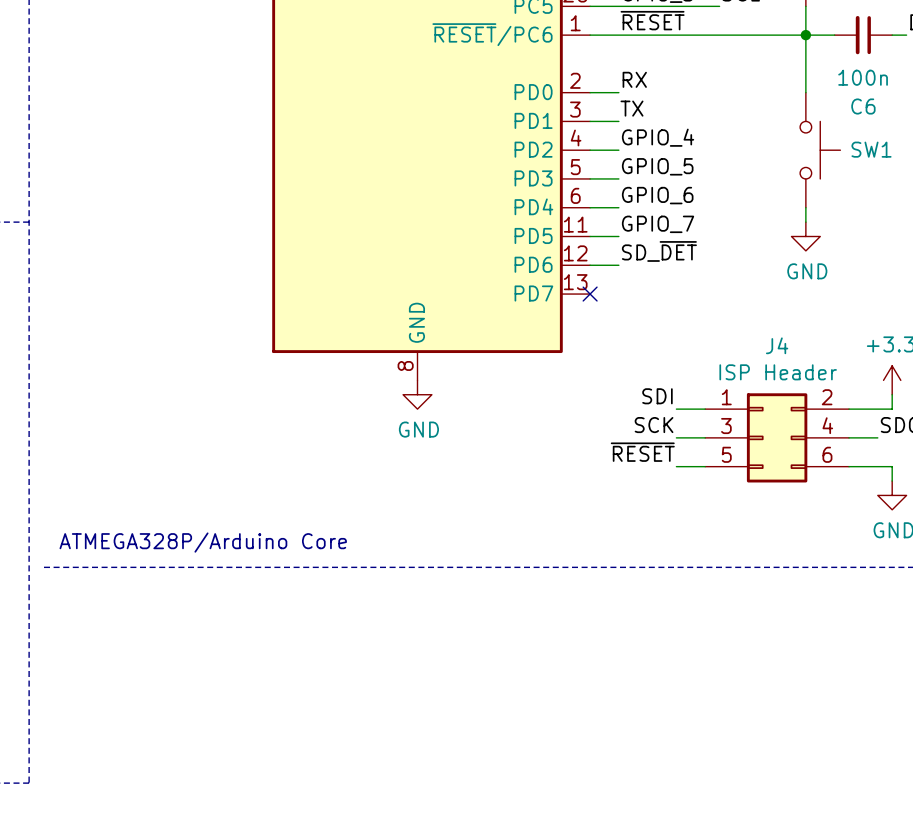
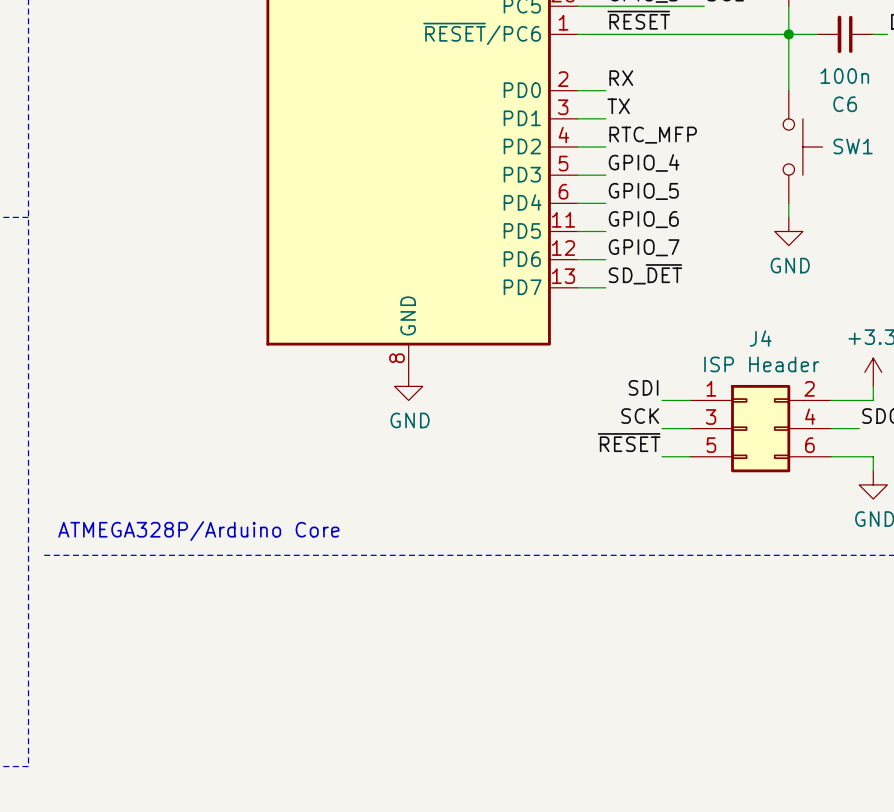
label: GPIO_4 (658, 137) -> RTC_MFP (653, 135)
label: GPIO_5 (657, 166) -> GPIO_4 (644, 162)
label: GPIO_6 (657, 195) -> GPIO_5 (643, 191)
label: GPIO_7 (658, 224) -> GPIO_6 (643, 219)
label: SD_~{DET} (659, 251) -> GPIO_7 (644, 247)
label: none -> SD_~{DET} (645, 274)
wire: none -> (577, 287) (605, 287)
no-connect mark: (590, 294) -> none

